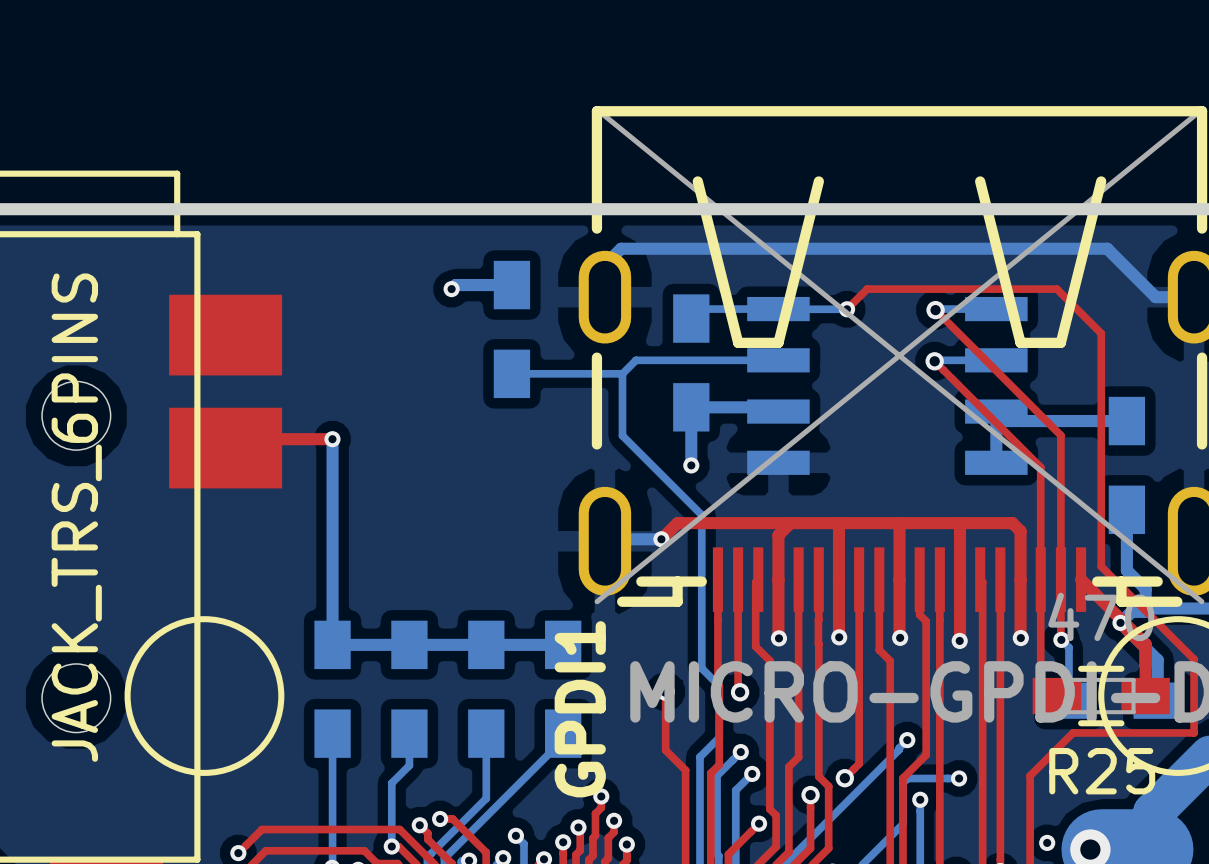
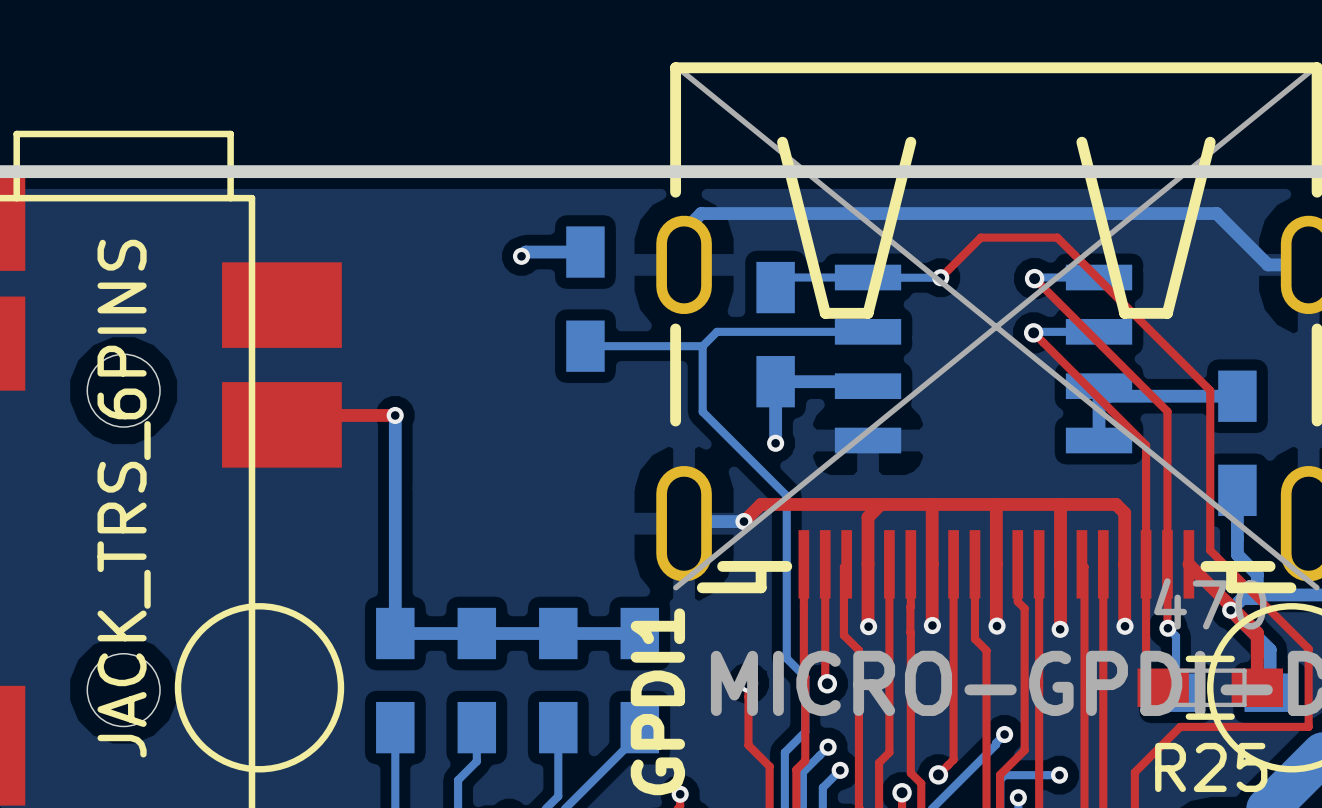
top track: (867, 289) (1056, 289) (1101, 333) (1101, 415) -> (962, 256) (980, 237) (1057, 237) (1210, 390)

